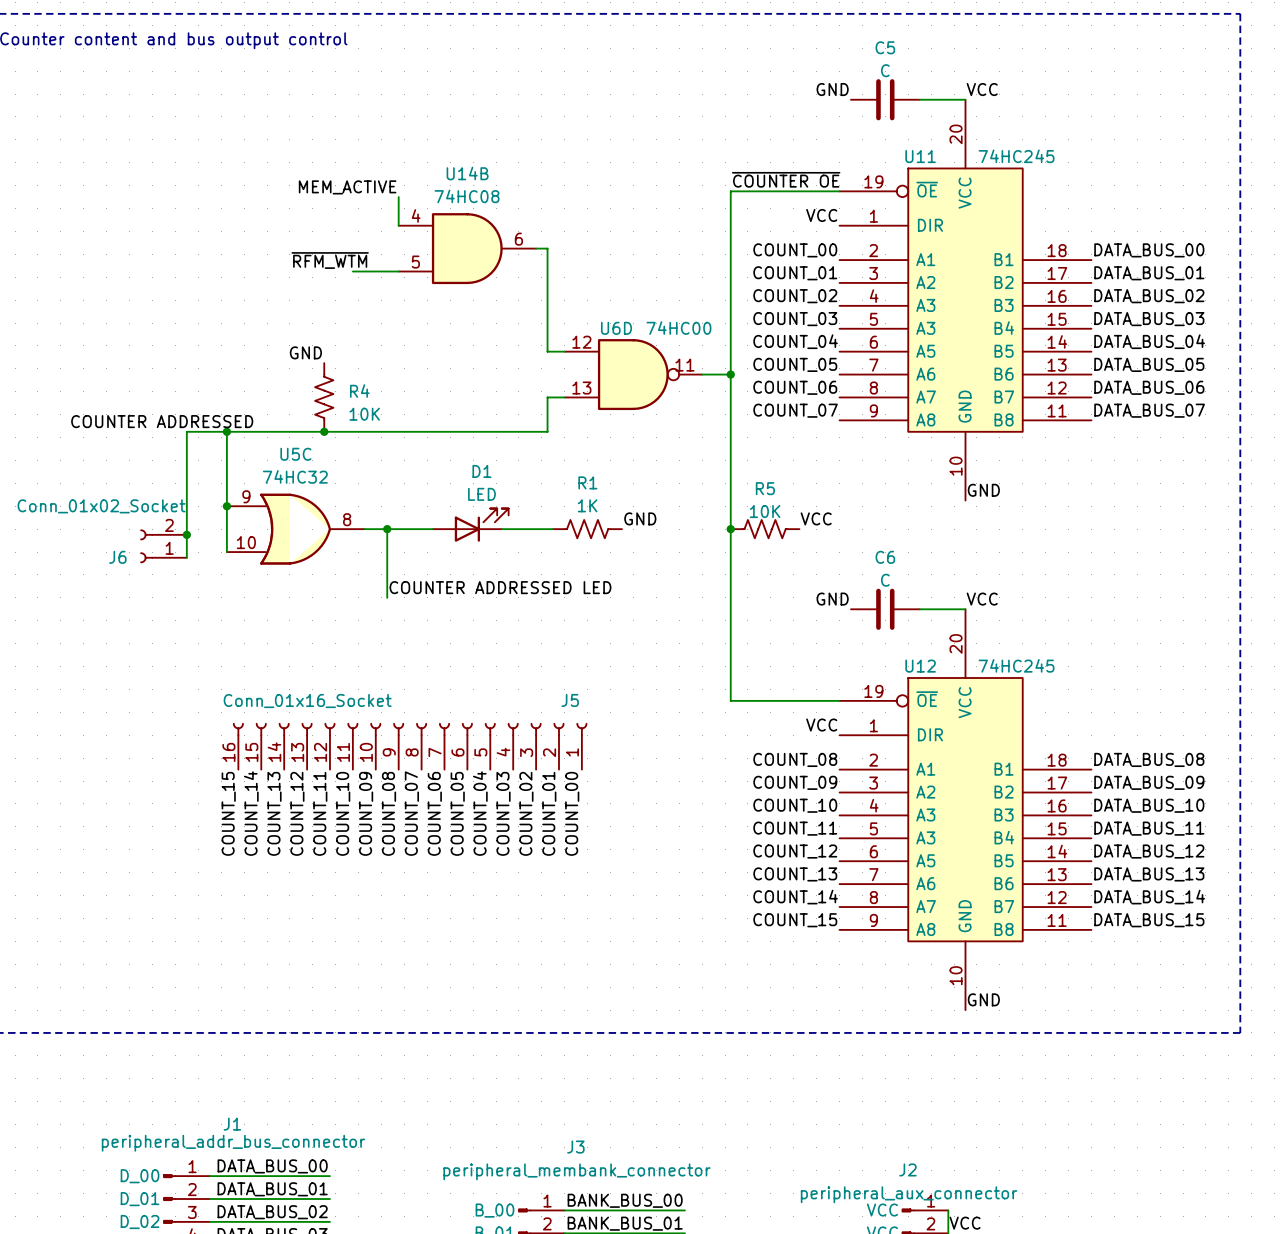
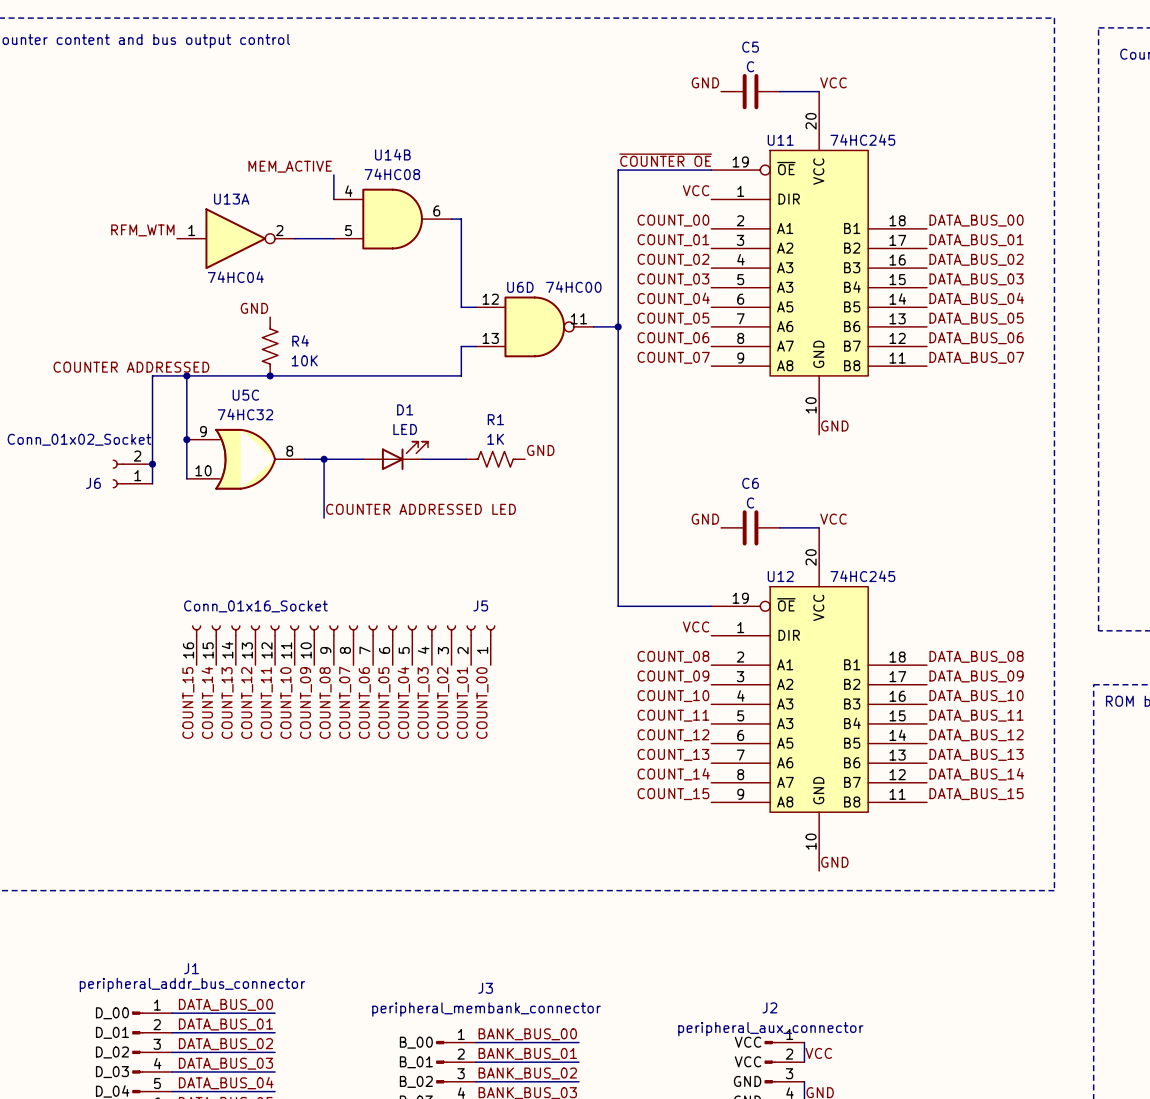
label: ~{RFM_WTM} (330, 260) -> none
label: none -> RFM_WTM (142, 230)
U13A: none -> 74HC04 (235, 238)
label: VCC (816, 518) -> none
junction: (730, 529) -> none
R5: 10K (765, 529) -> none

